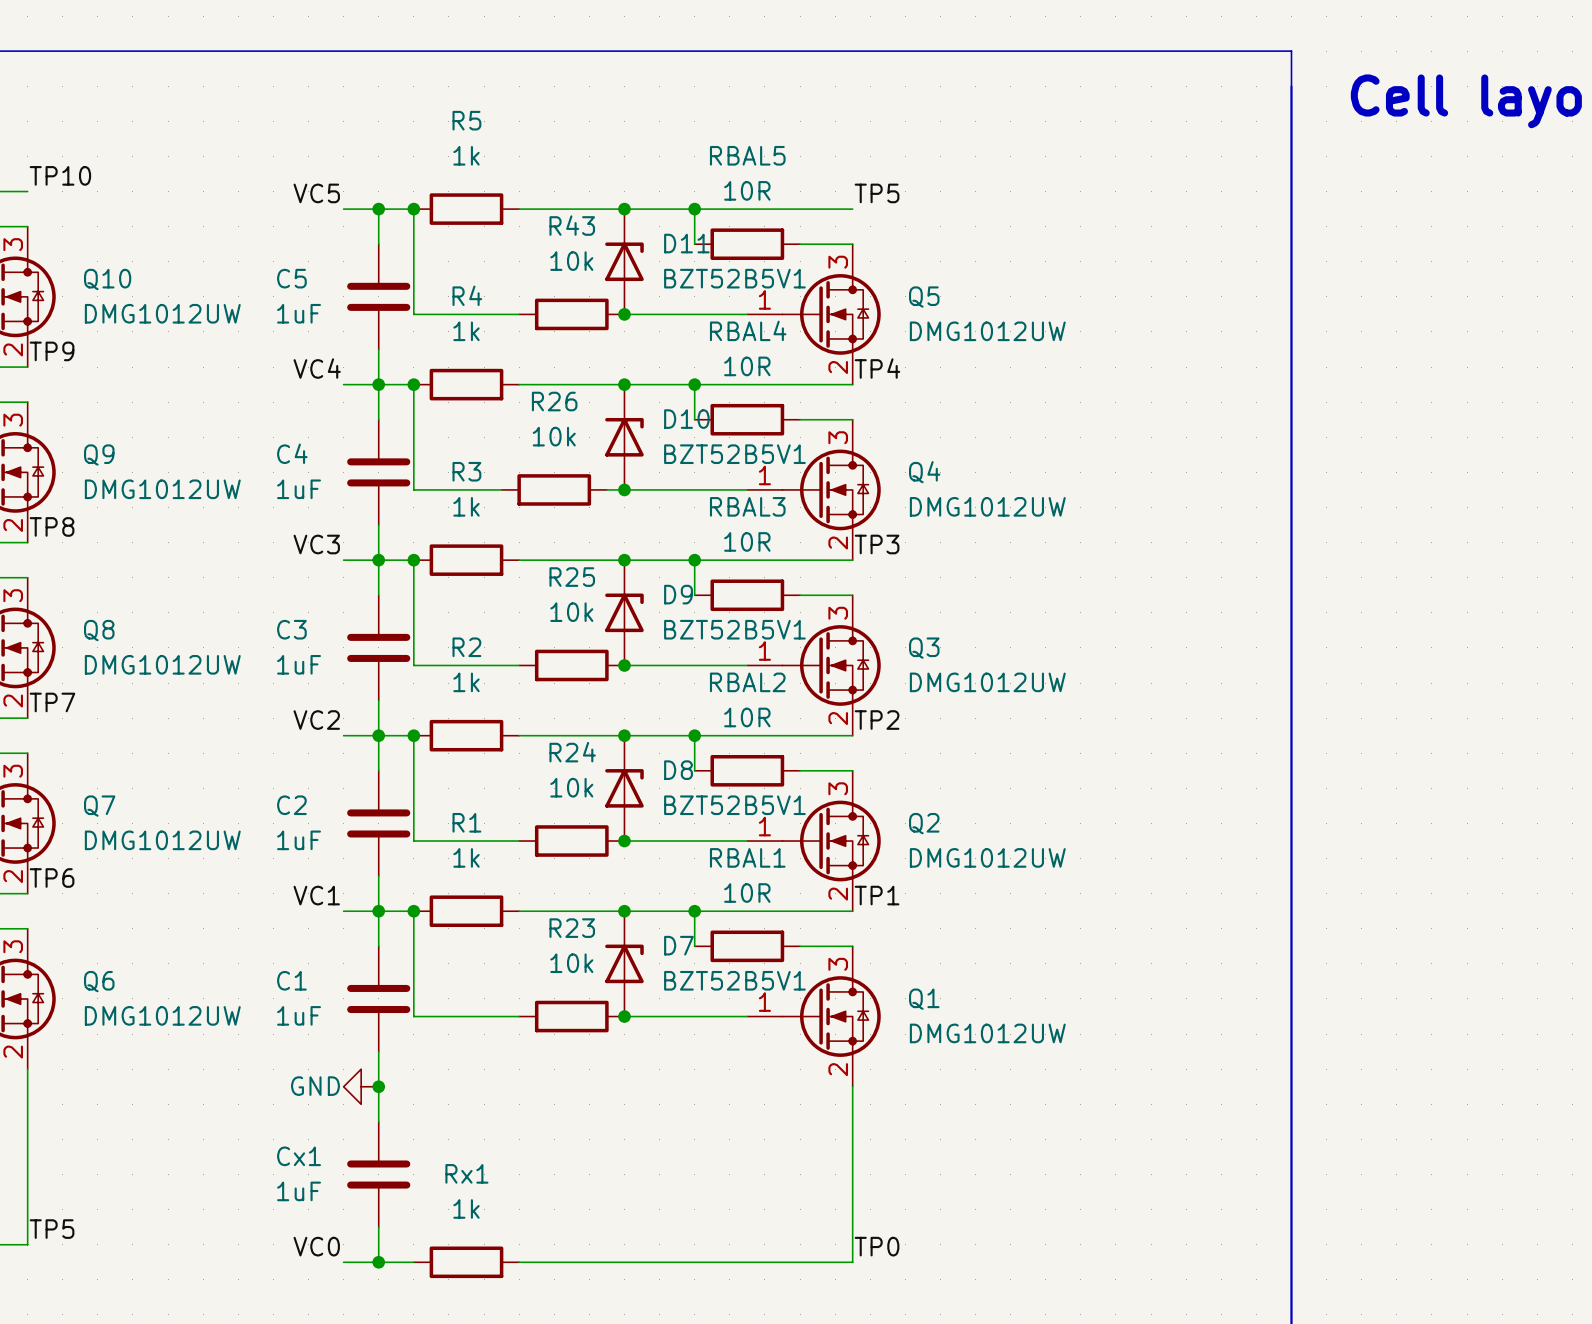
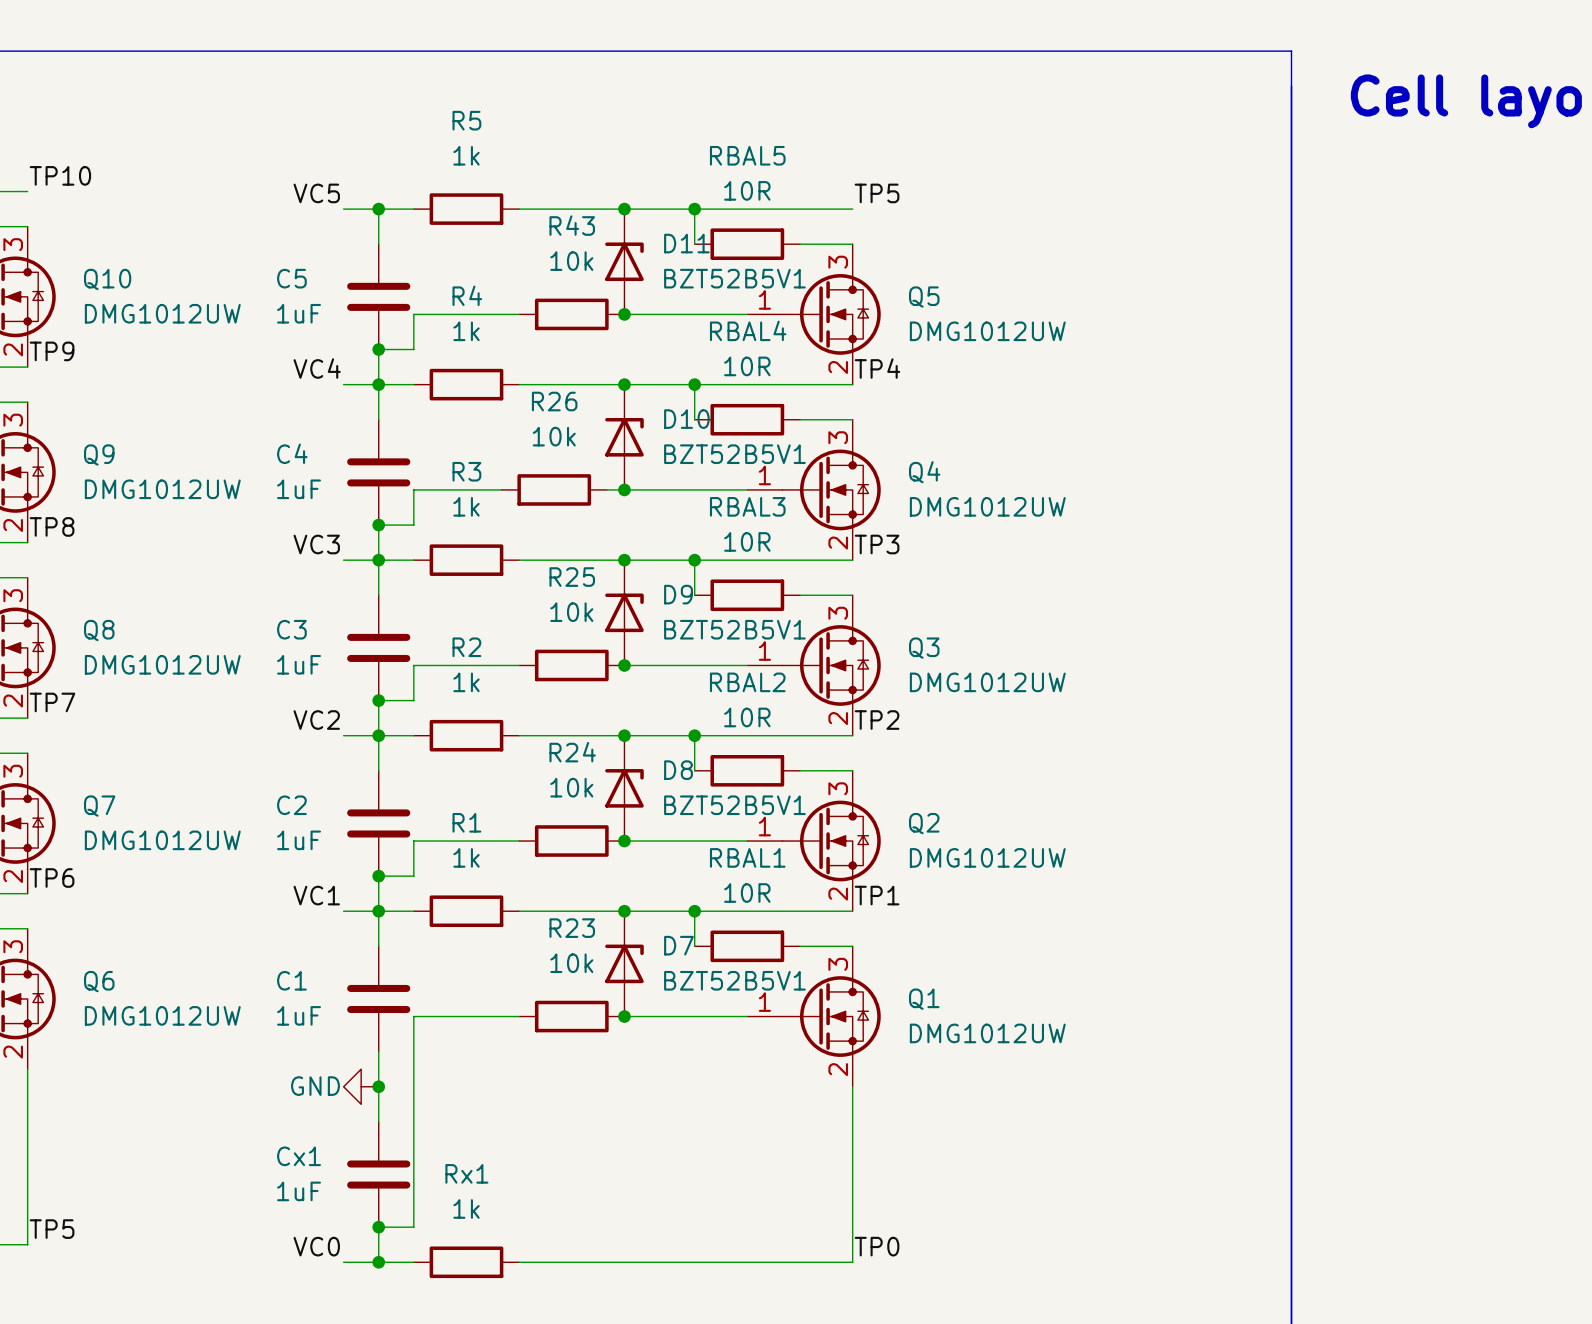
wire: (413, 209) (413, 314) -> (378, 349) (413, 349) (413, 314)
junction: (413, 209) -> none
wire: (413, 384) (413, 489) -> (378, 525) (413, 525) (413, 489)
junction position: (413, 384) -> (378, 349)
wire: (413, 560) (413, 665) -> (378, 700) (413, 700) (413, 665)
junction position: (413, 560) -> (378, 525)
wire: (413, 735) (413, 841) -> (378, 876) (413, 876) (413, 841)
junction position: (413, 735) -> (378, 700)
wire: (413, 911) (413, 1016) -> (378, 1227) (413, 1227) (413, 1016)
junction position: (413, 911) -> (378, 876)
junction: none -> (378, 1227)

